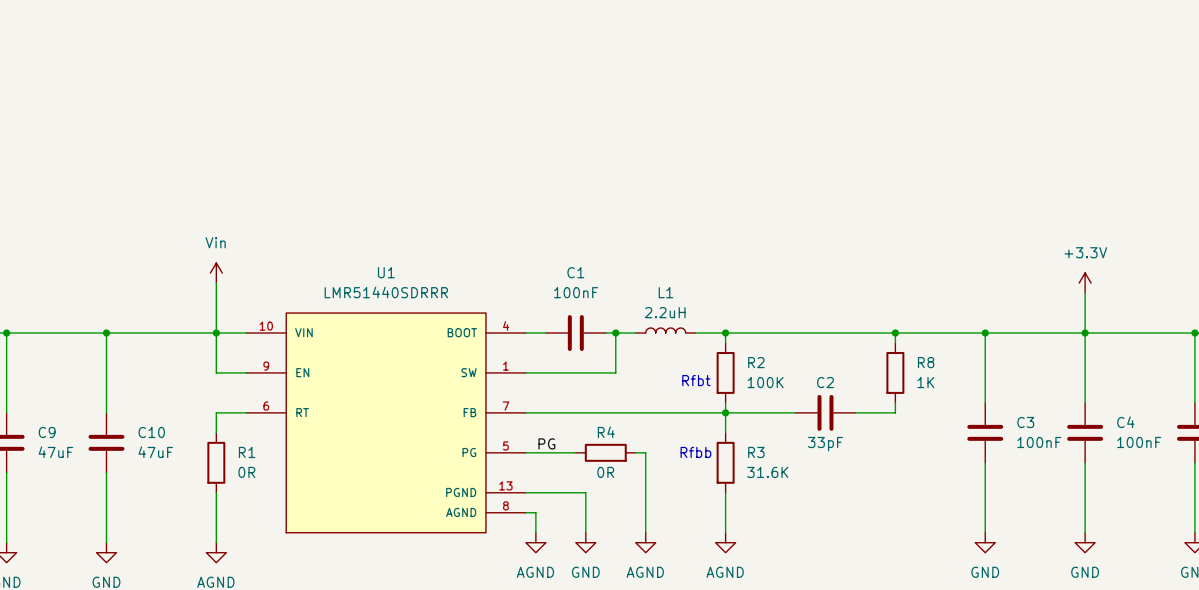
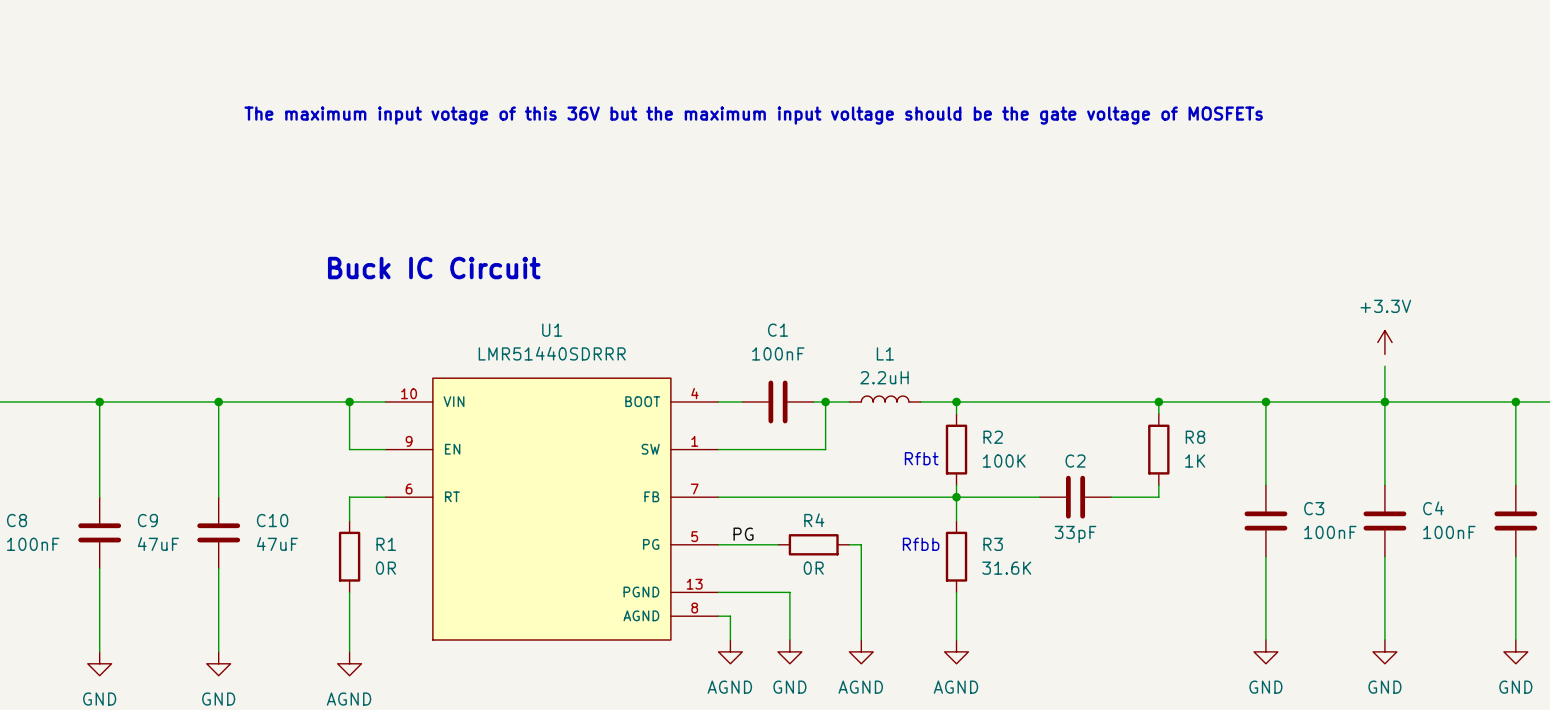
text: none -> The maximum input votage of this 36V but the maximum input voltage should be the gate voltage of MOSFETs (753, 115)
text: none -> Buck IC Circuit (434, 268)
power symbol: Vin (216, 273) -> none
wire: (216, 283) (216, 333) -> none
wire: (1085, 293) (1085, 303) -> none

